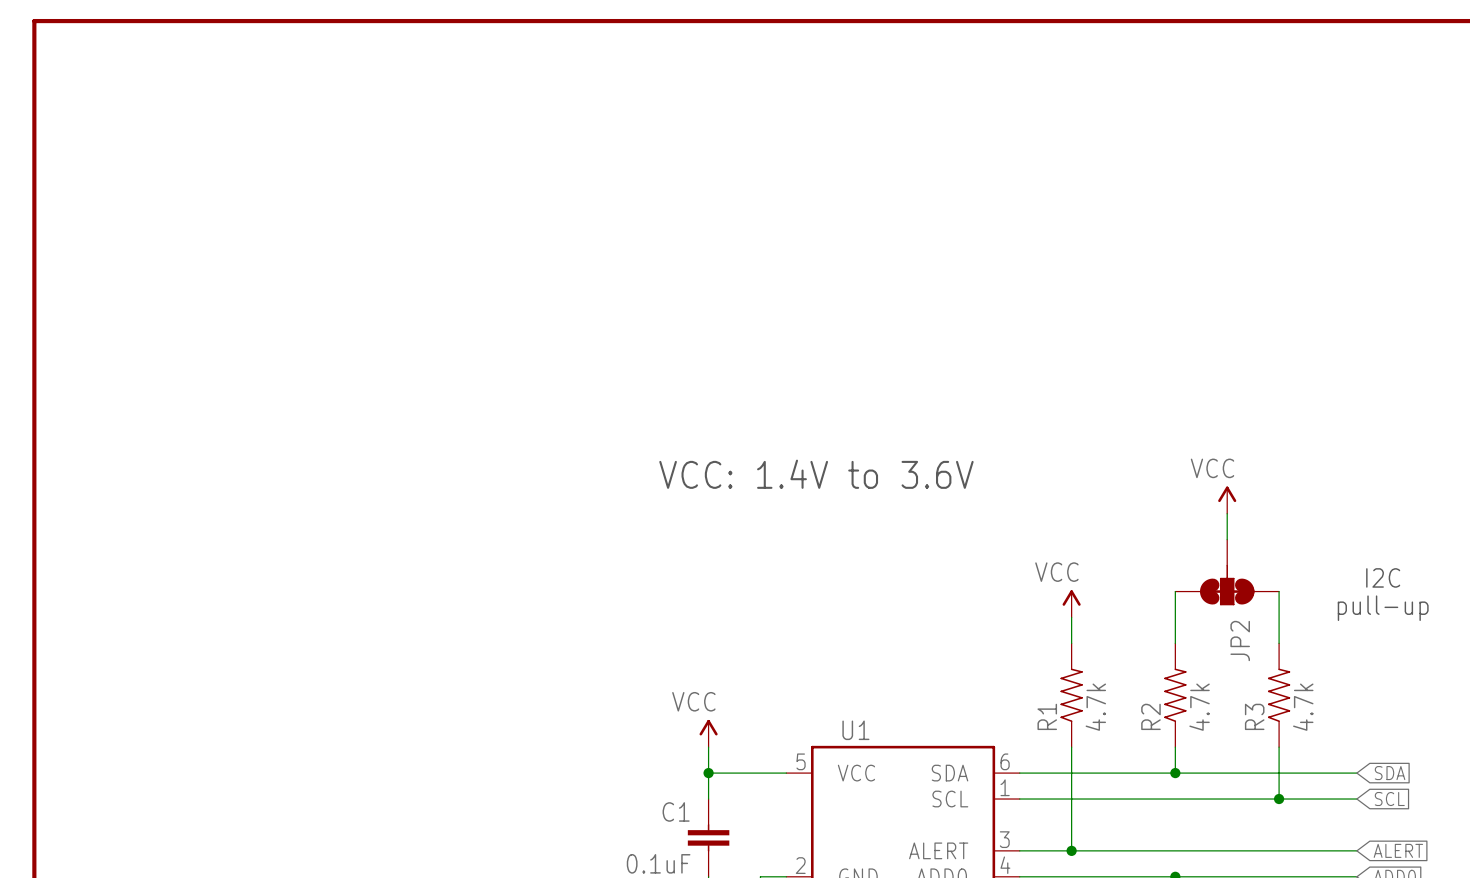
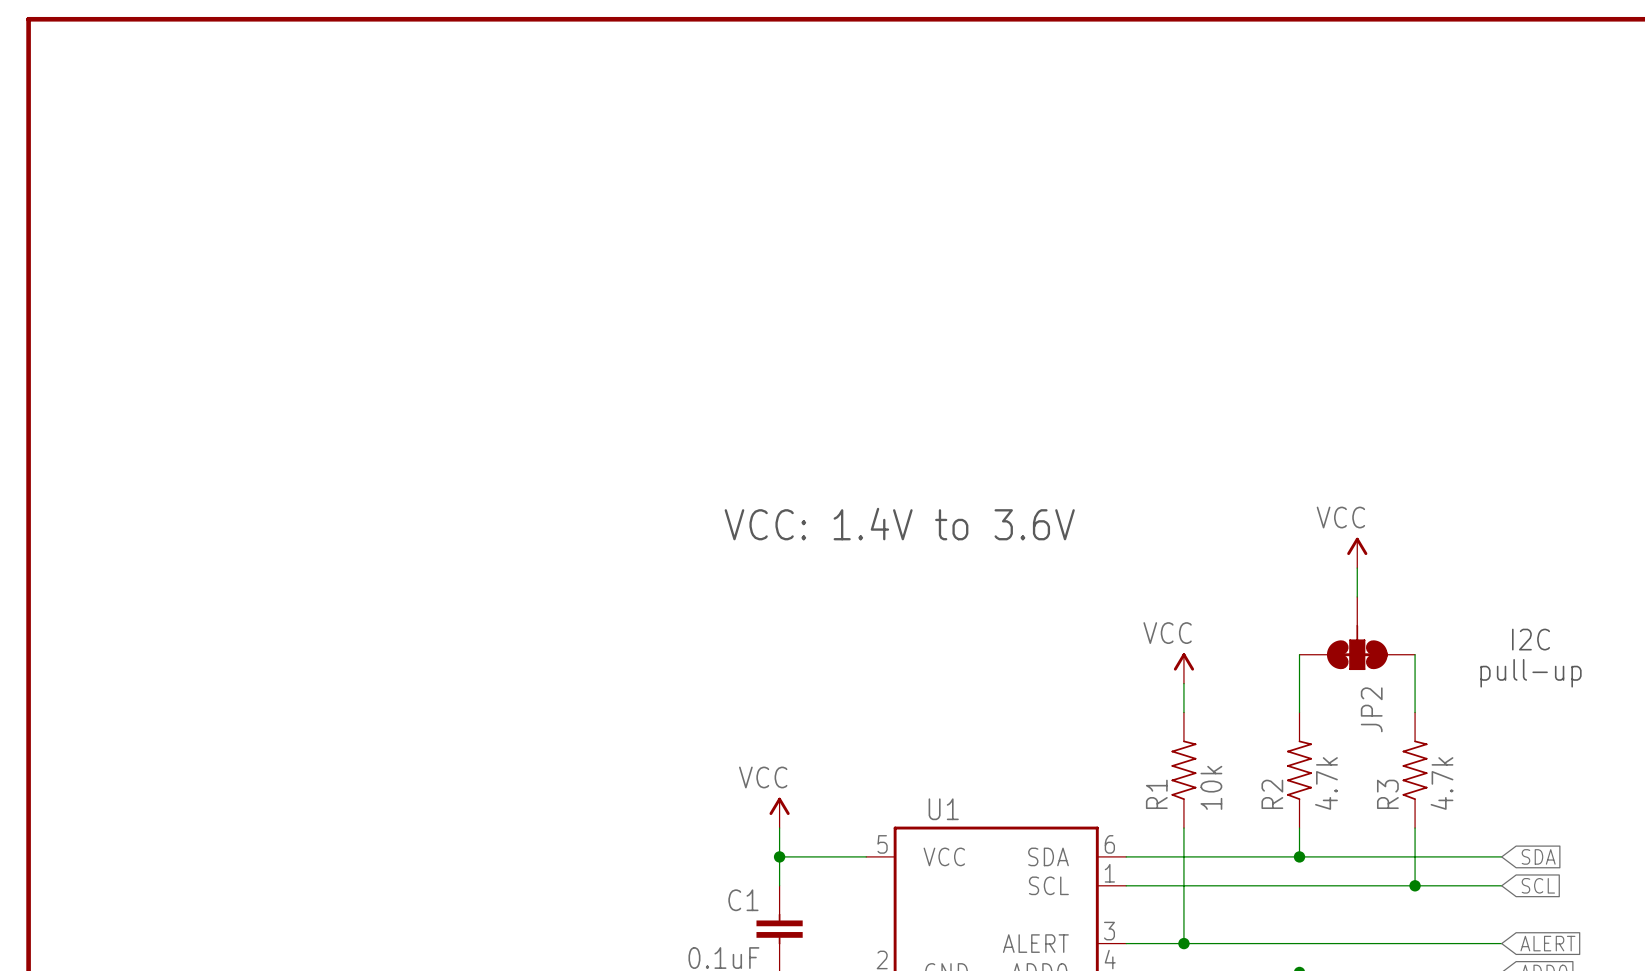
R1 value: 4.7k (1095, 707) -> 10k (1211, 787)

